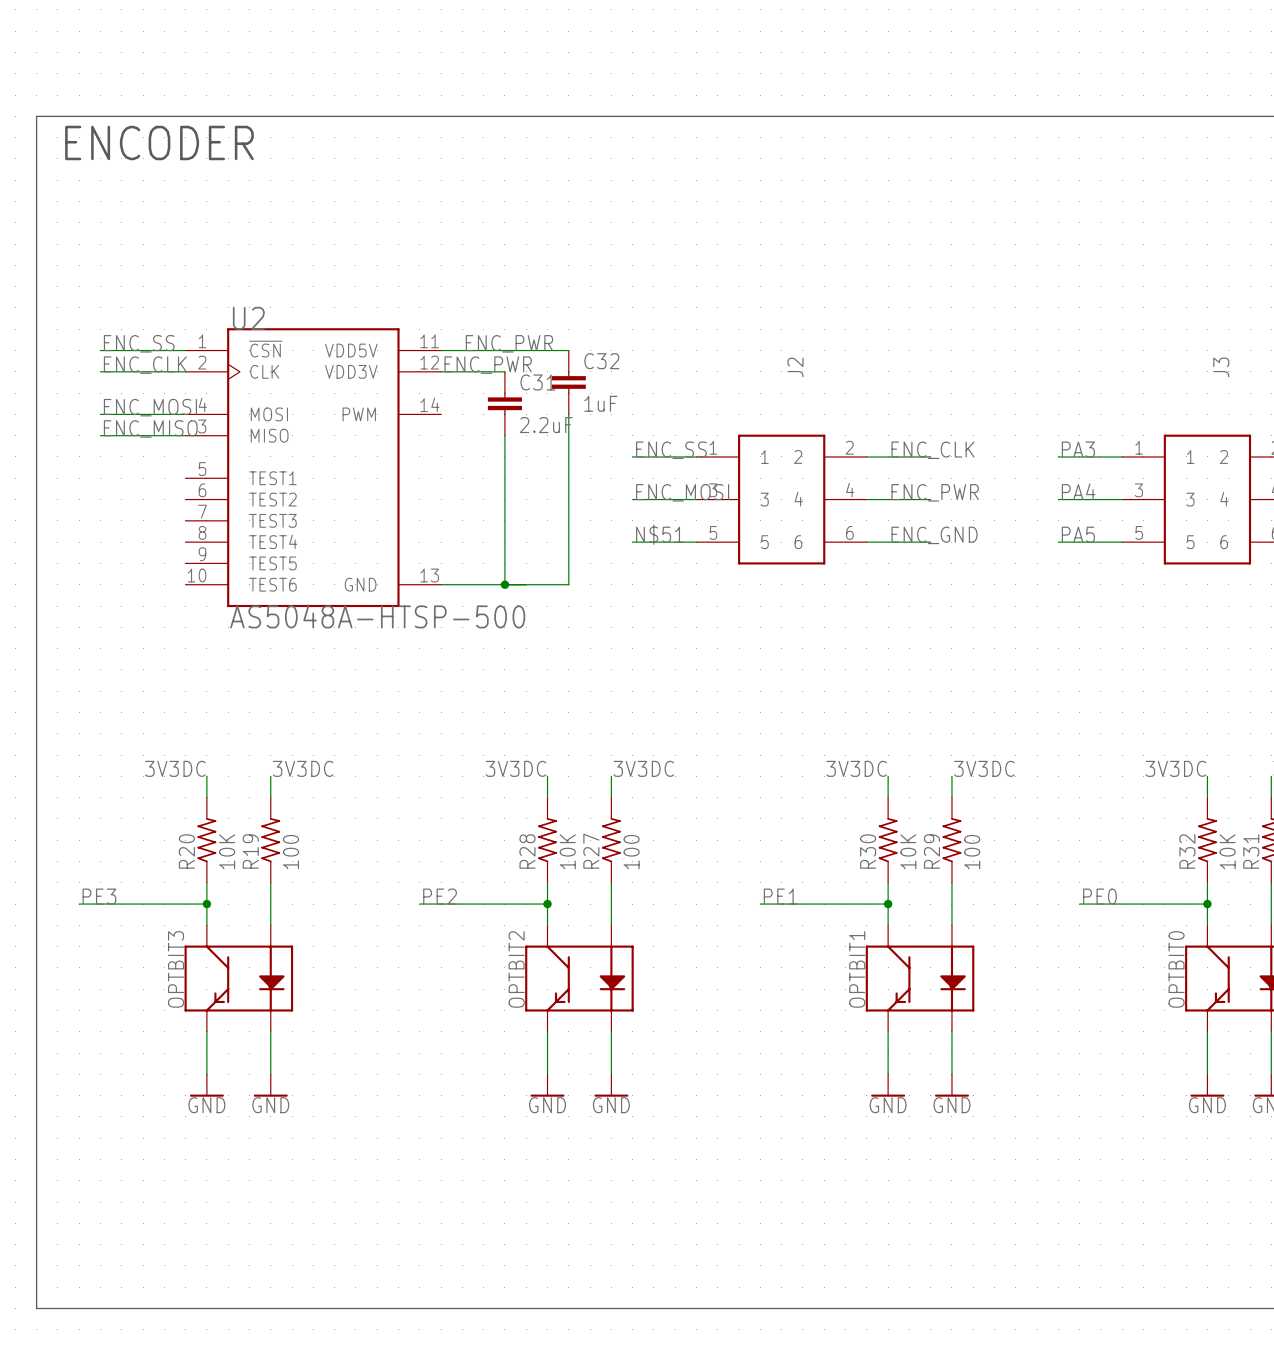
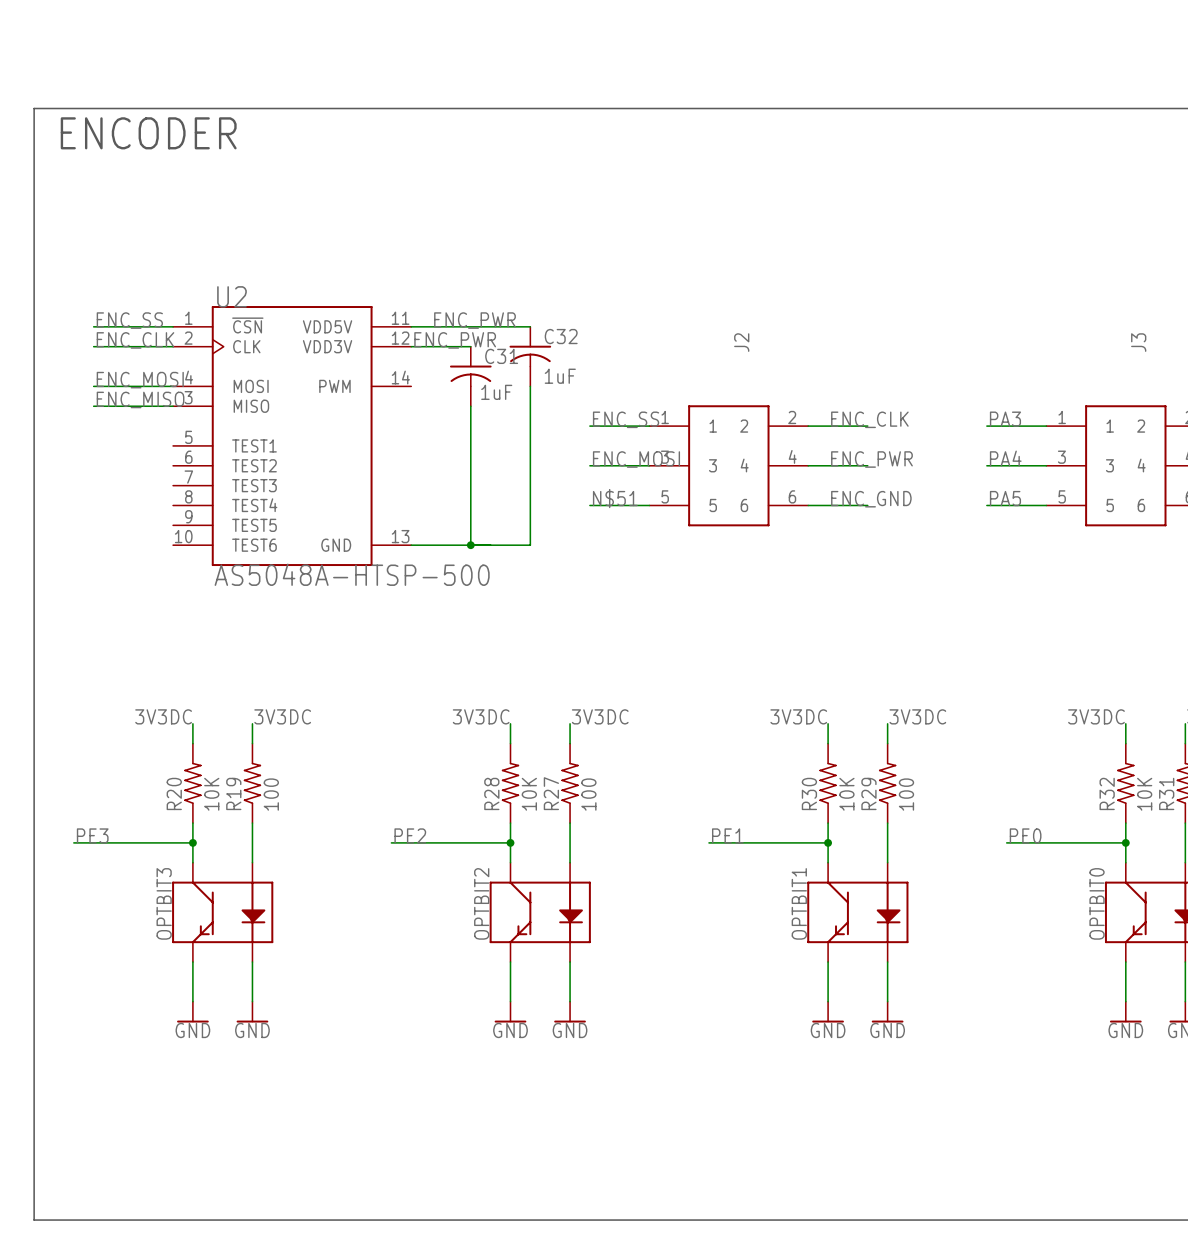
C32 symbol: [551, 350, 586, 415] -> [509, 326, 552, 387]
C31 symbol: [487, 371, 522, 436] -> [449, 346, 492, 407]
C31 value: 2.2uF (546, 425) -> 1uF (496, 392)

